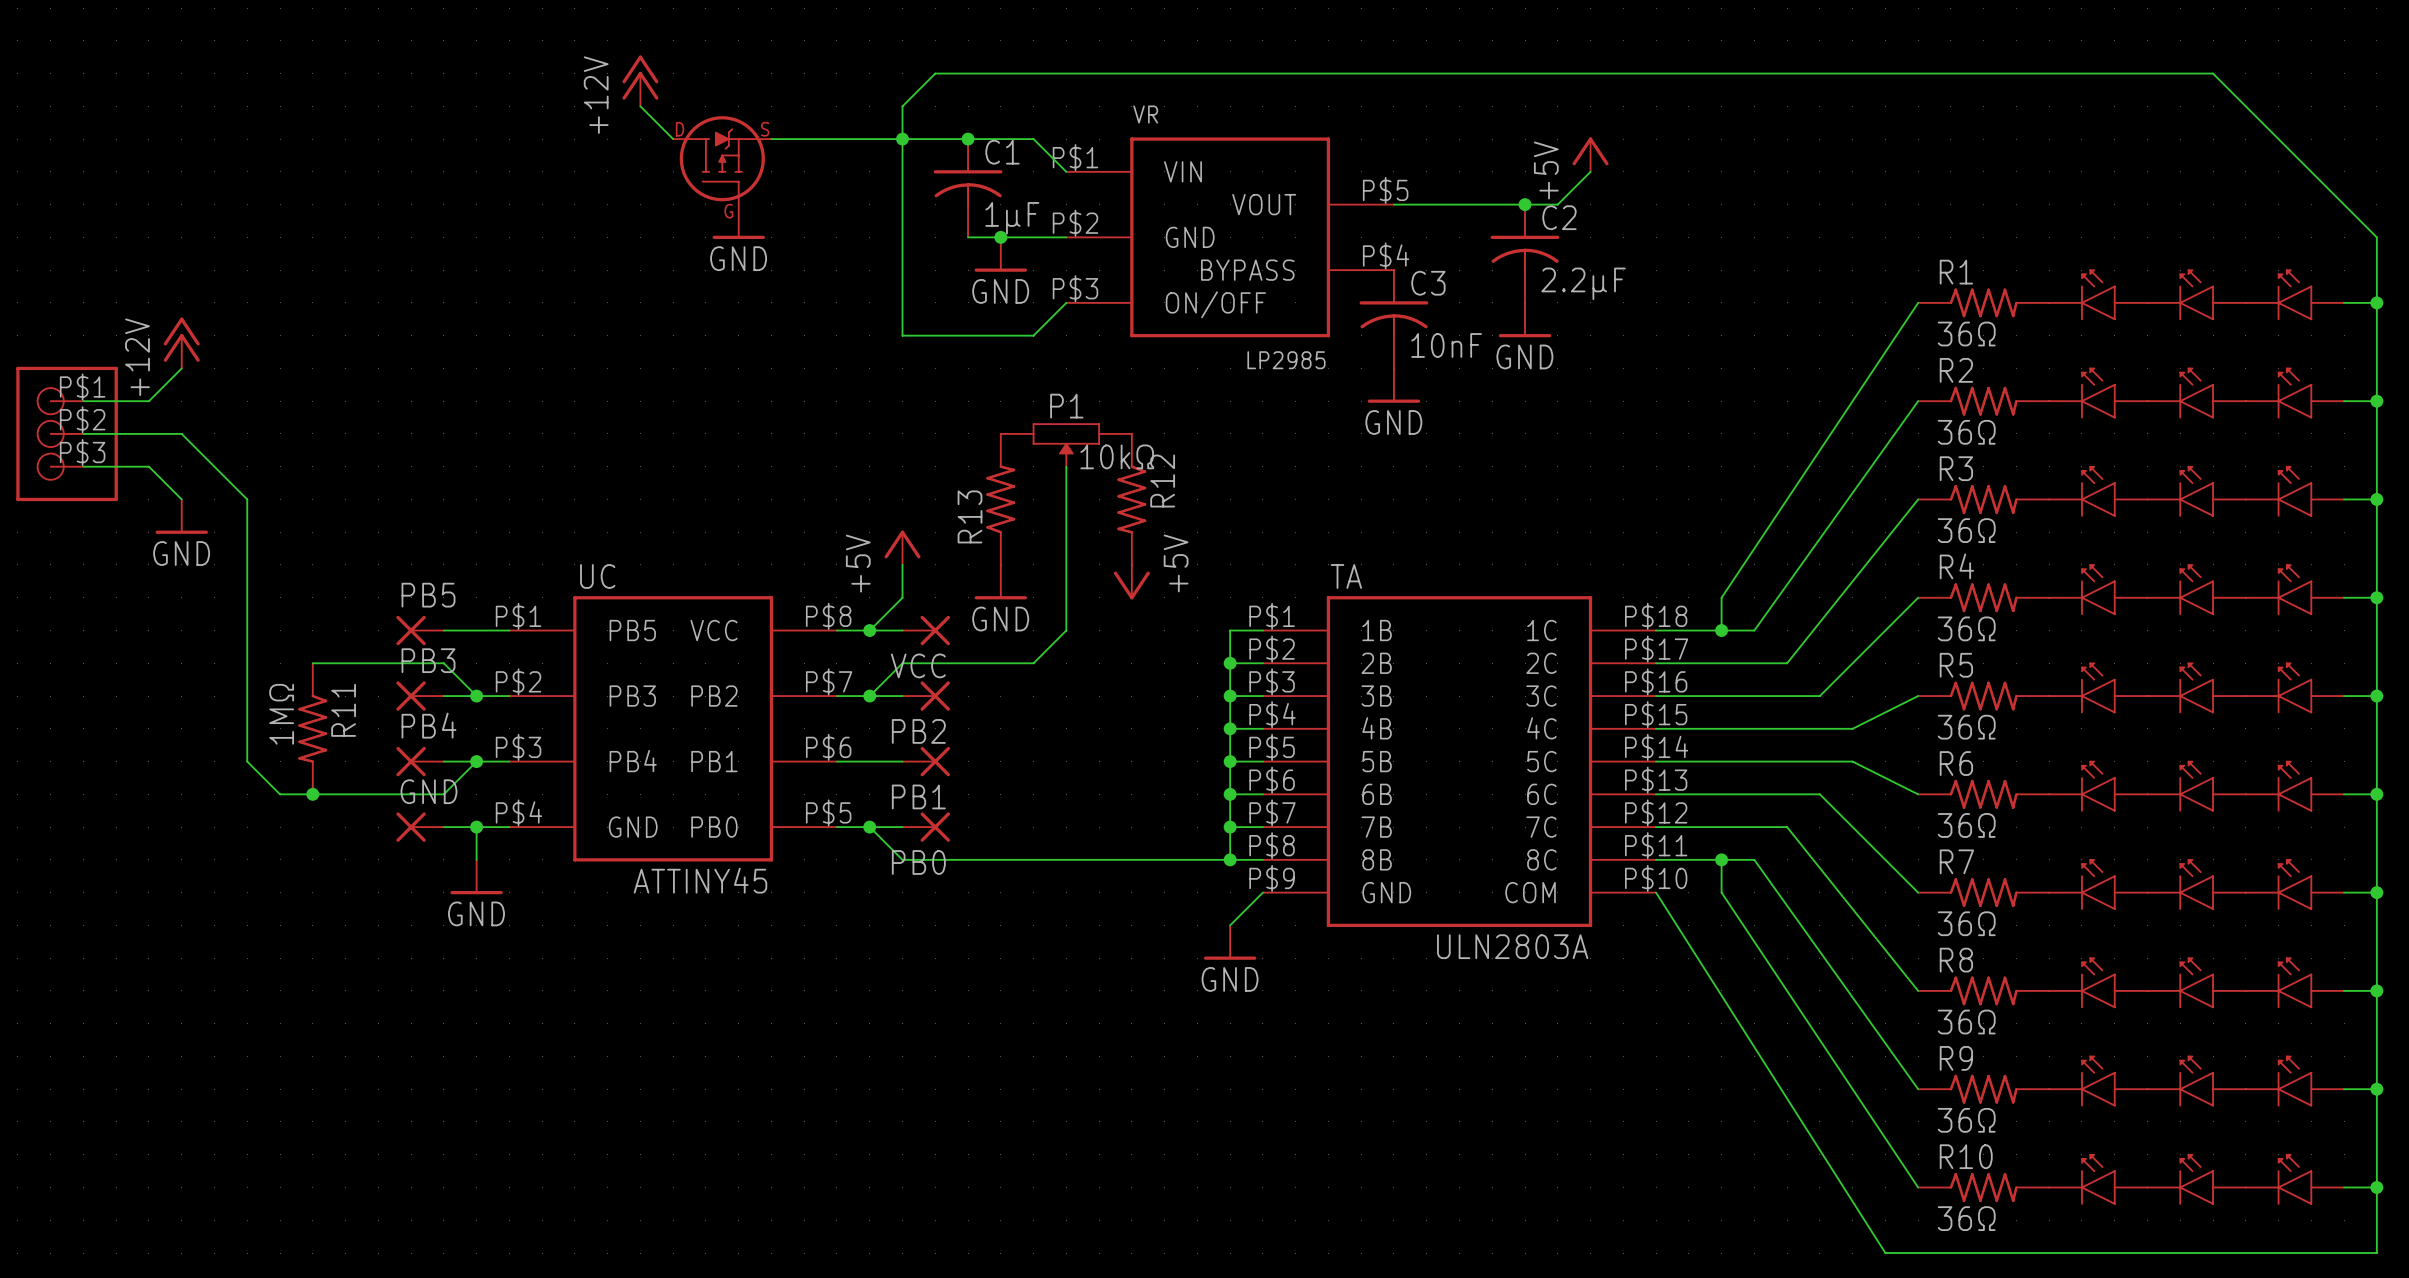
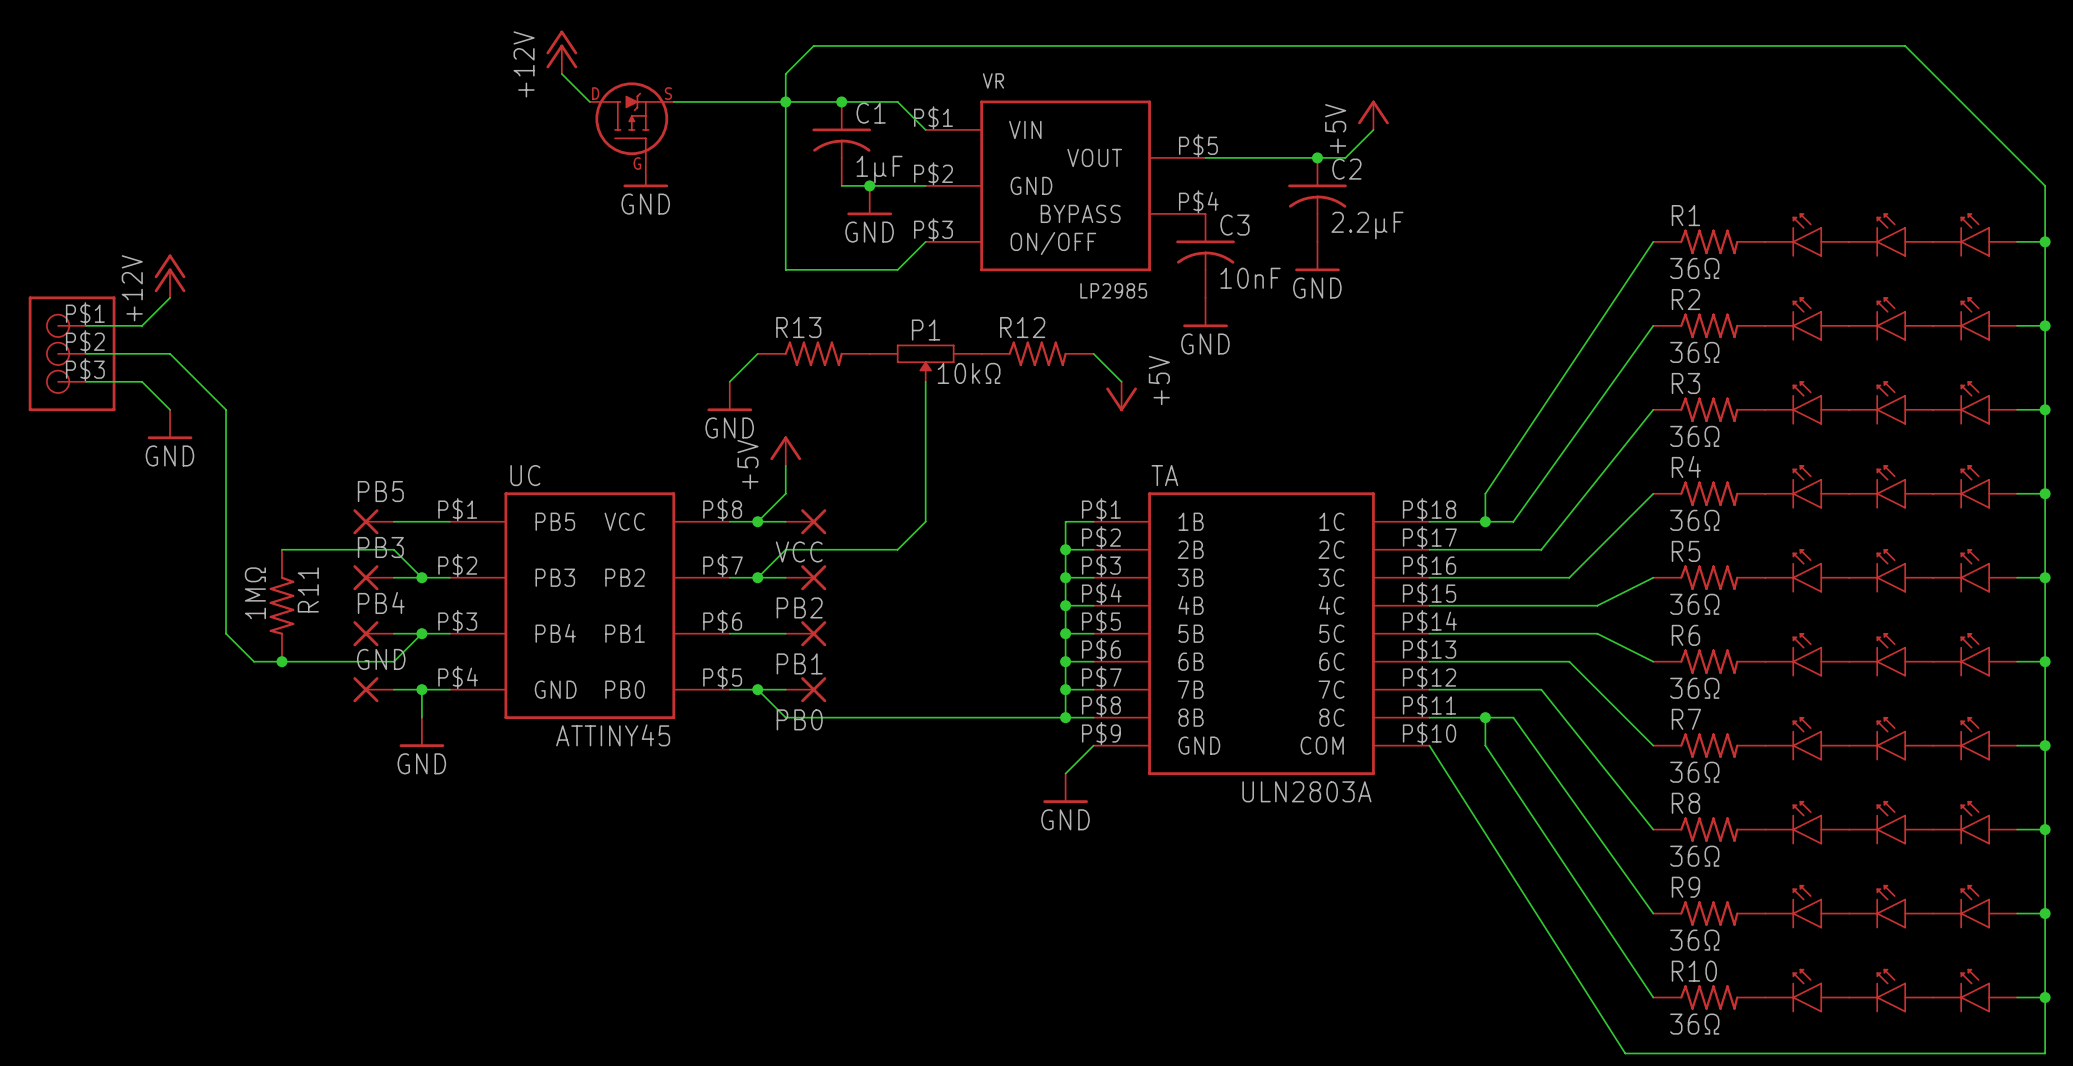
wire: none -> (757, 353) (729, 381)
wire: none -> (1093, 353) (1121, 381)
R13 rotation: 0° (1000, 499) -> 90° clockwise (813, 353)
R13 position: (1000, 499) -> (813, 353)
R12 rotation: 0° (1131, 499) -> 90° counterclockwise (1037, 353)
R12 position: (1131, 499) -> (1037, 353)
power symbol position: GND (1000, 582) -> GND (729, 396)
power symbol position: +5V (1131, 582) -> +5V (1121, 396)

